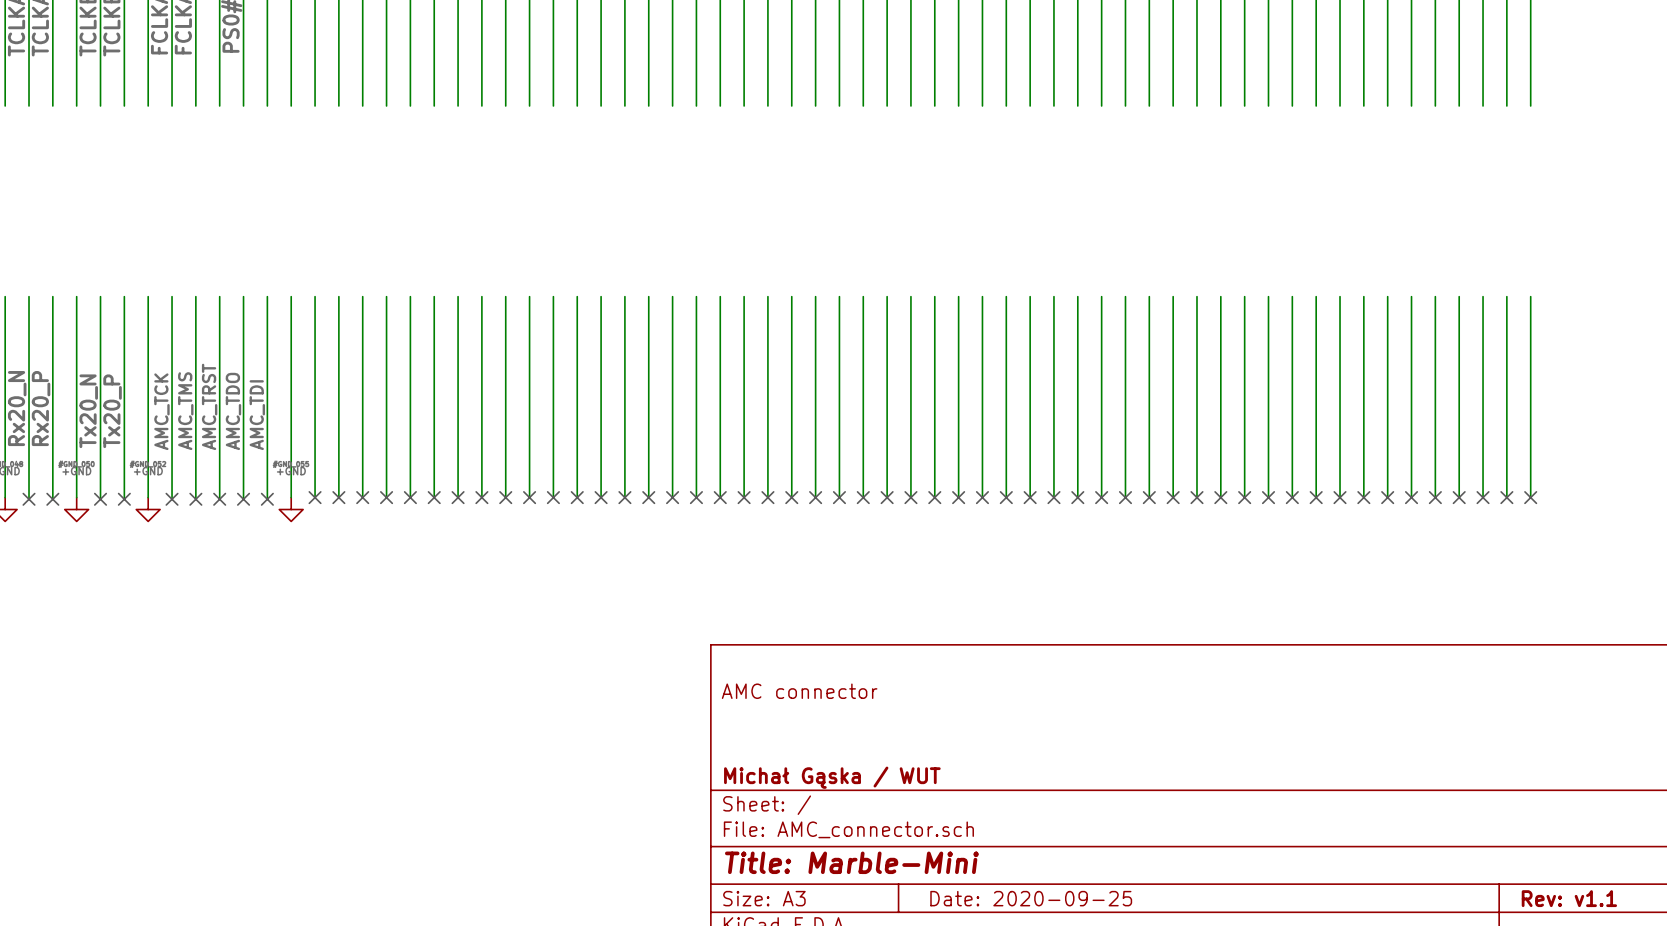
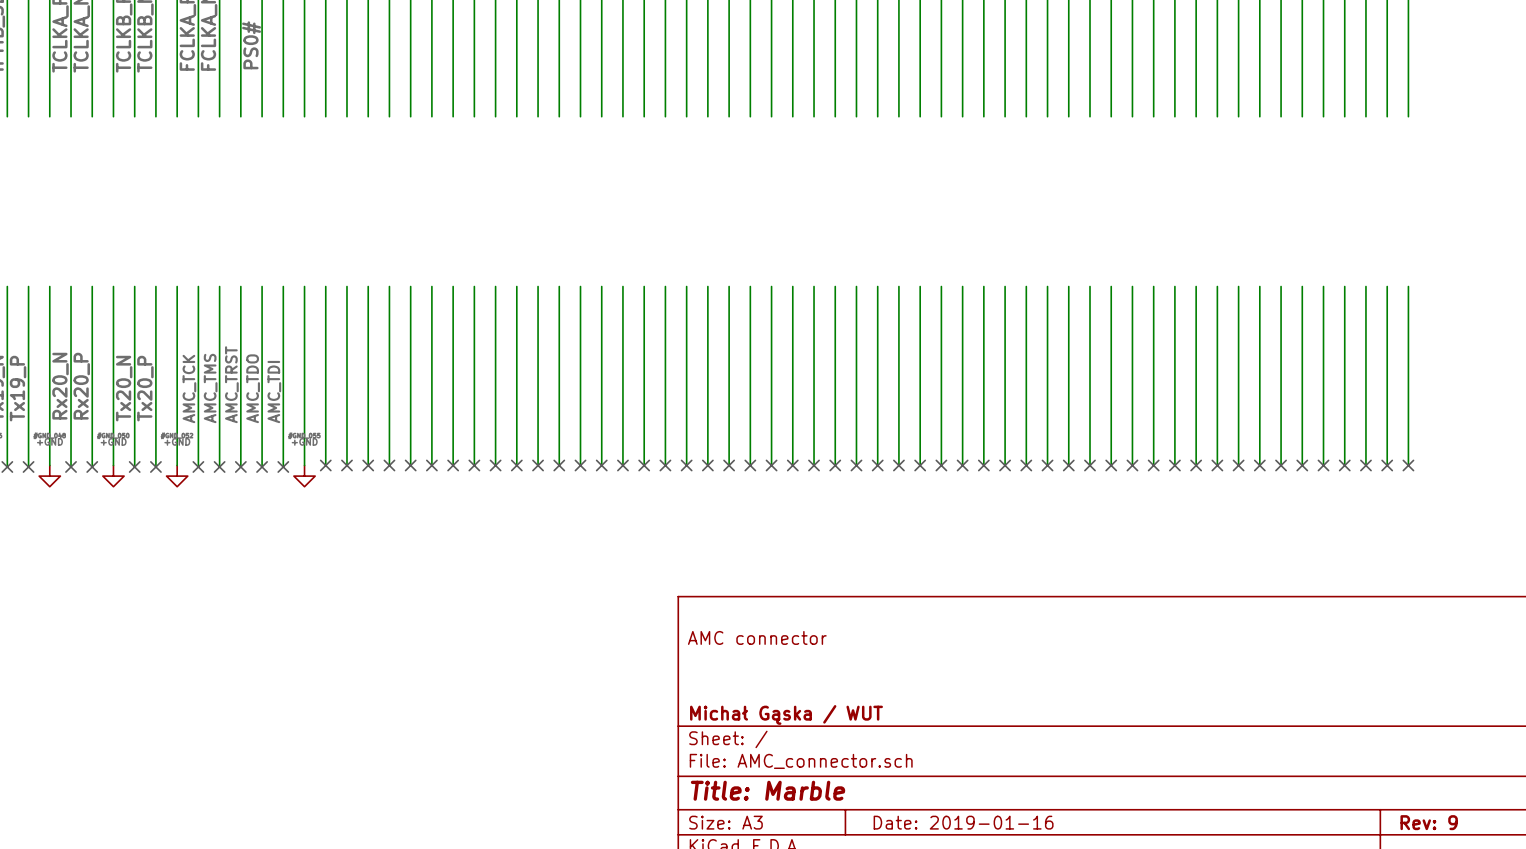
title block: Title: Marble-Mini (851, 862) -> Title: Marble (768, 790)
title block: Date: 2020-09-25 (1031, 898) -> Date: 2019-01-16 (963, 822)
title block: Rev: v1.1 (1569, 898) -> Rev: 9 (1429, 822)

